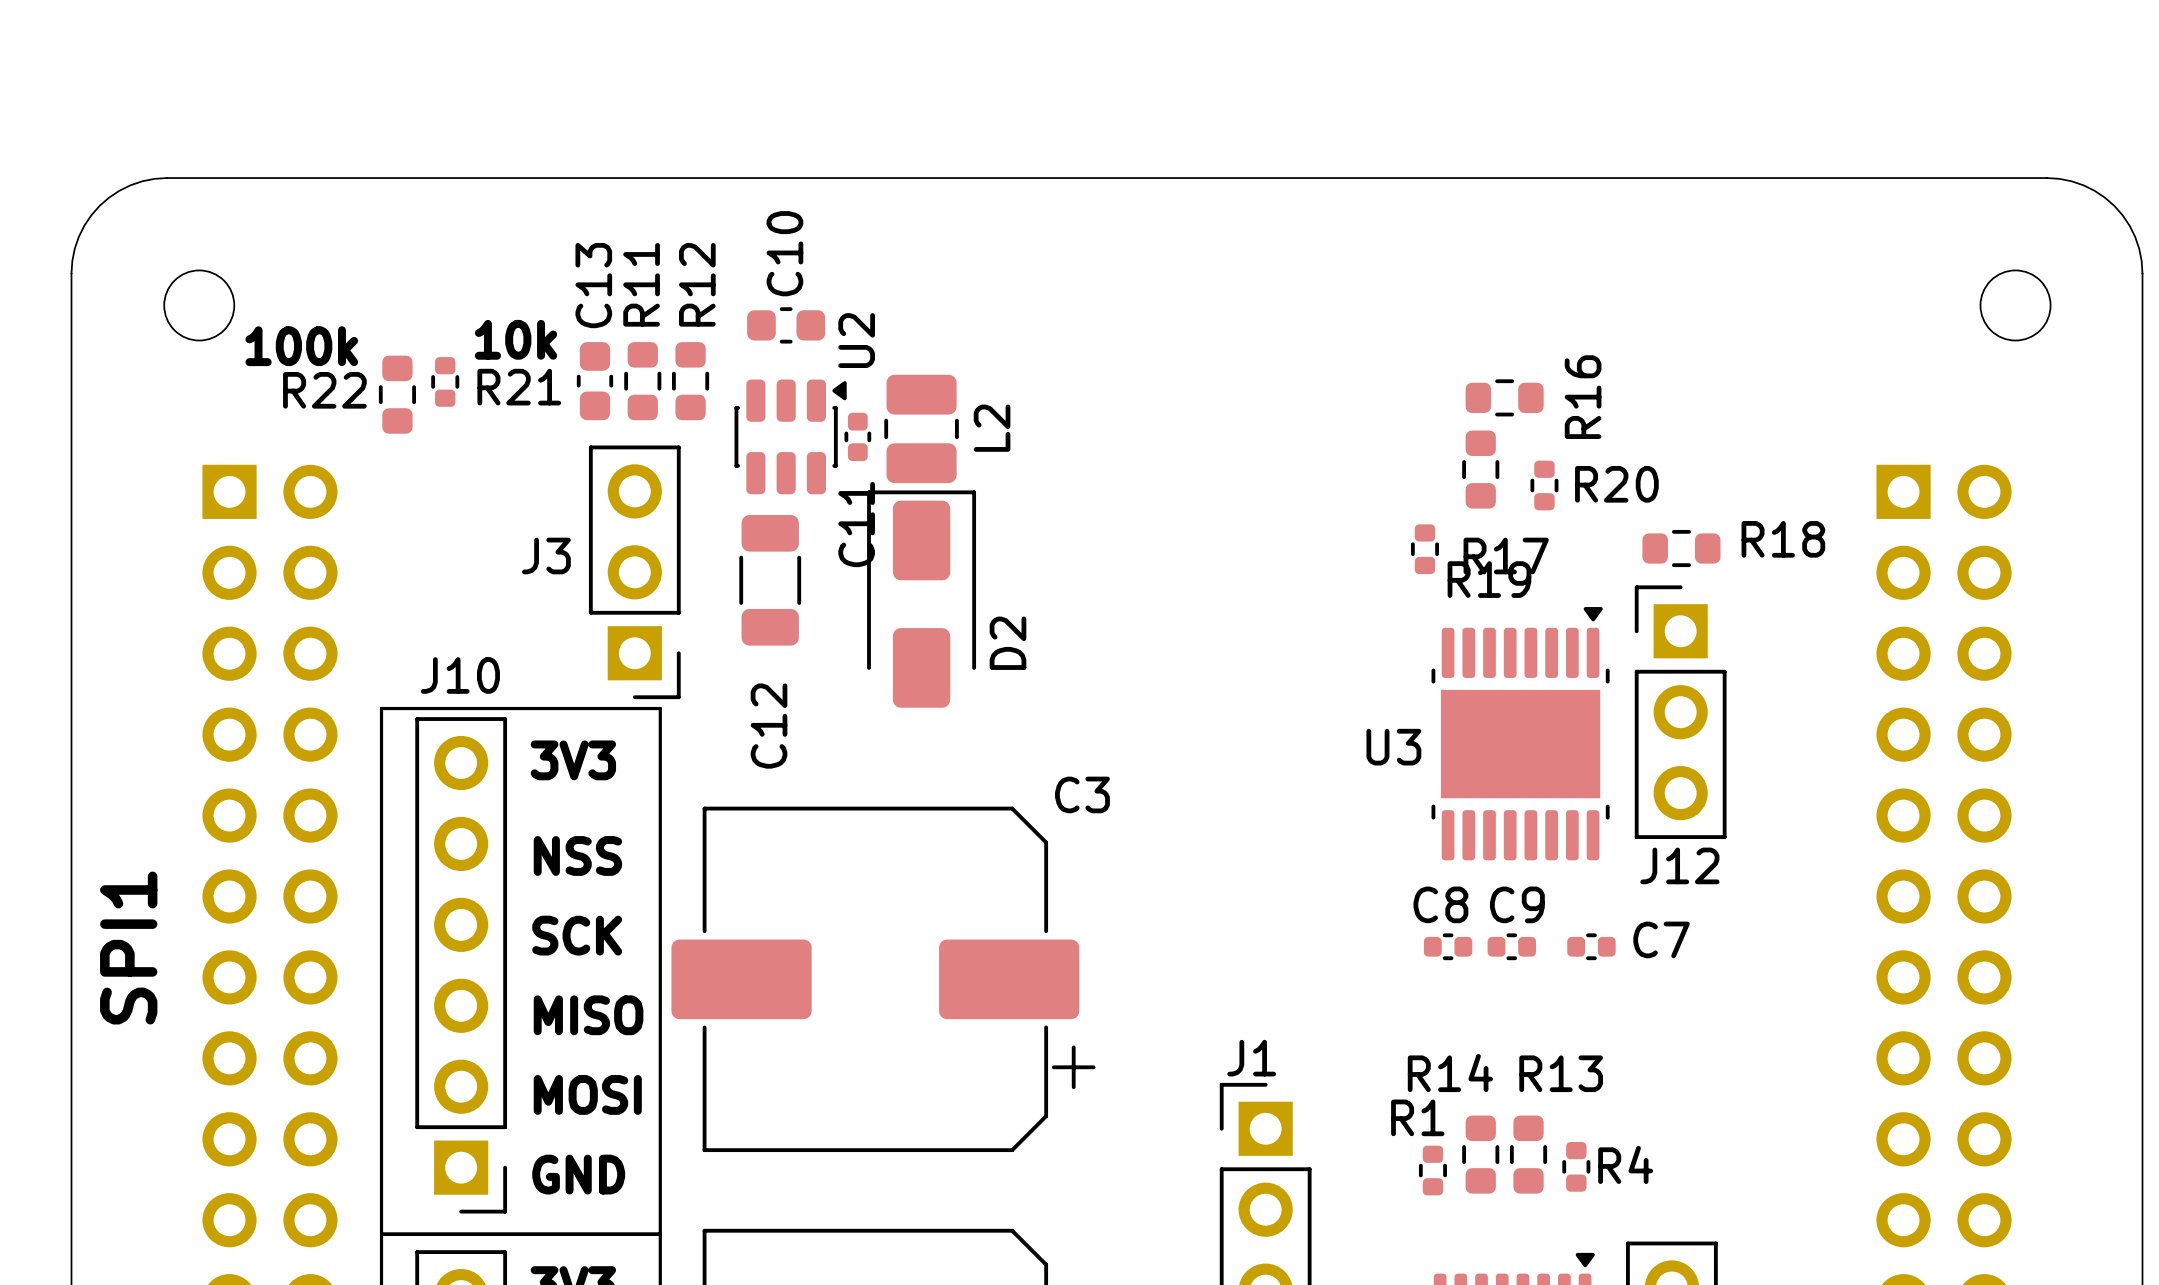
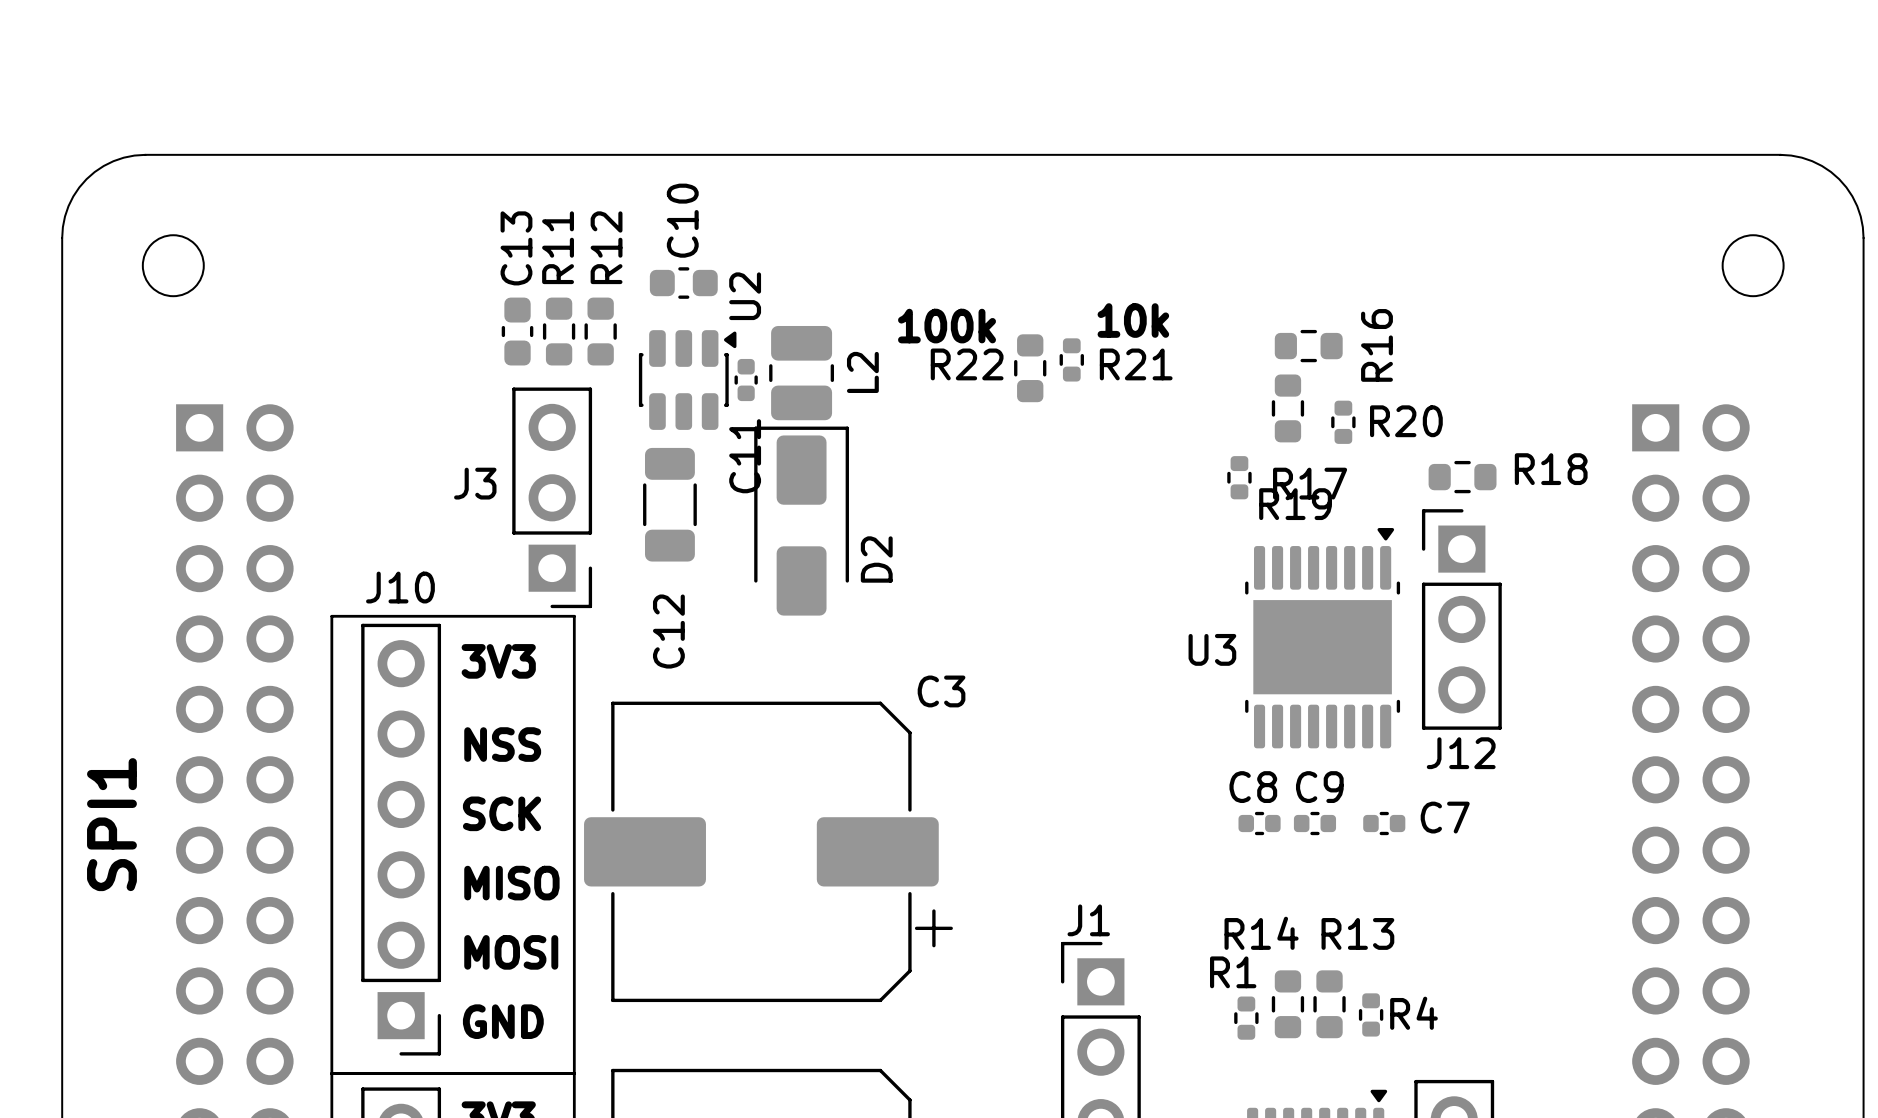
text position: 10k (516, 339) -> 10k (1133, 320)
text position: 100k (301, 346) -> 100k (947, 326)
R21 position: (445, 381) -> (1071, 359)
R22 position: (397, 394) -> (1030, 368)

